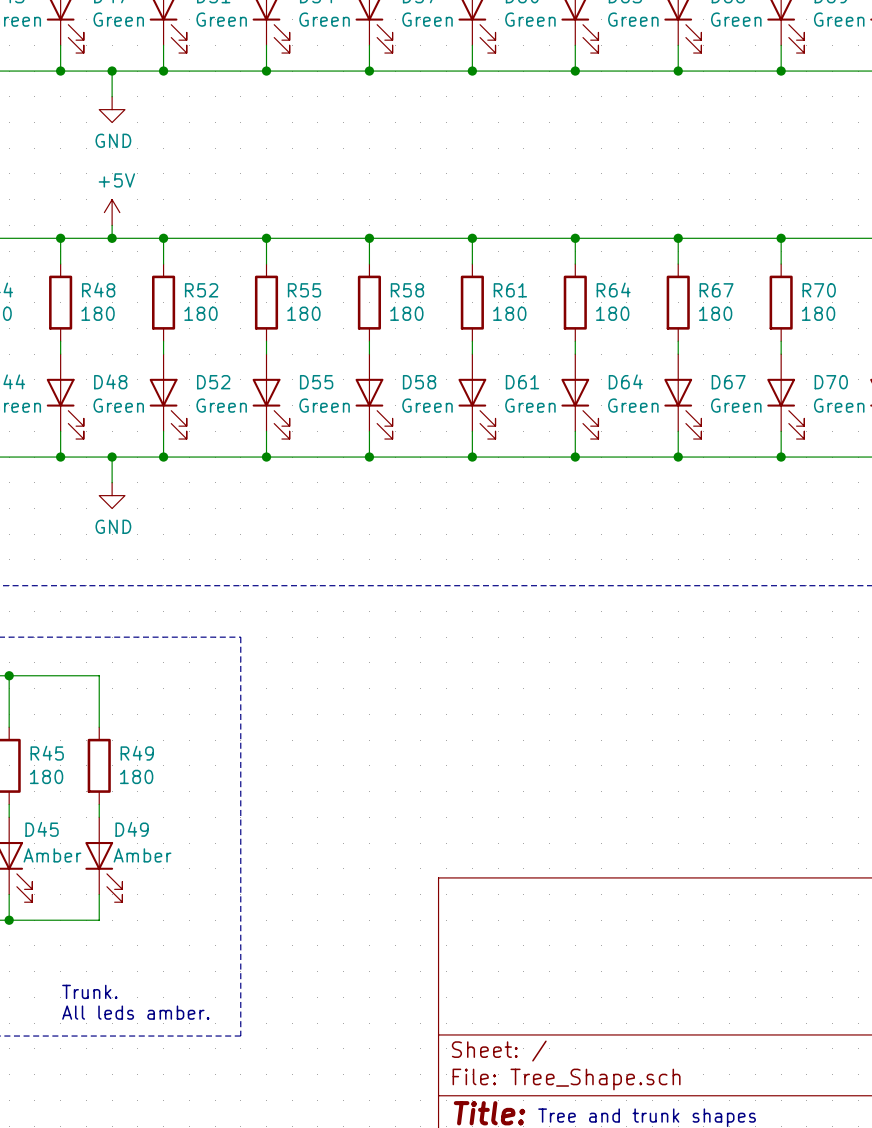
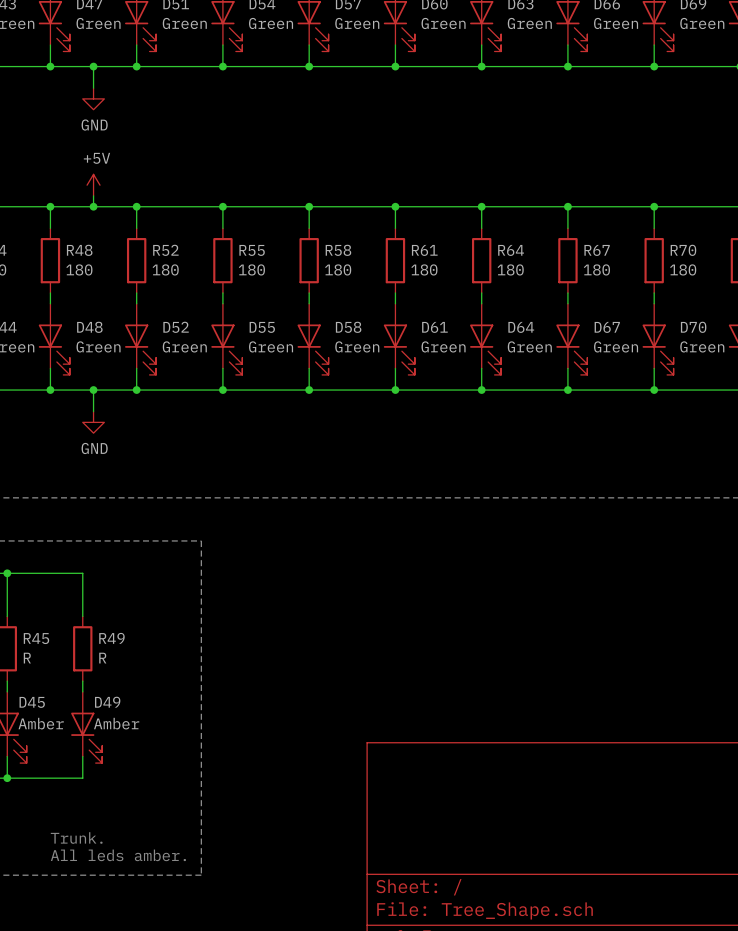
R45 value: 180 (46, 776) -> R (27, 658)
R49 value: 180 (136, 776) -> R (102, 658)

